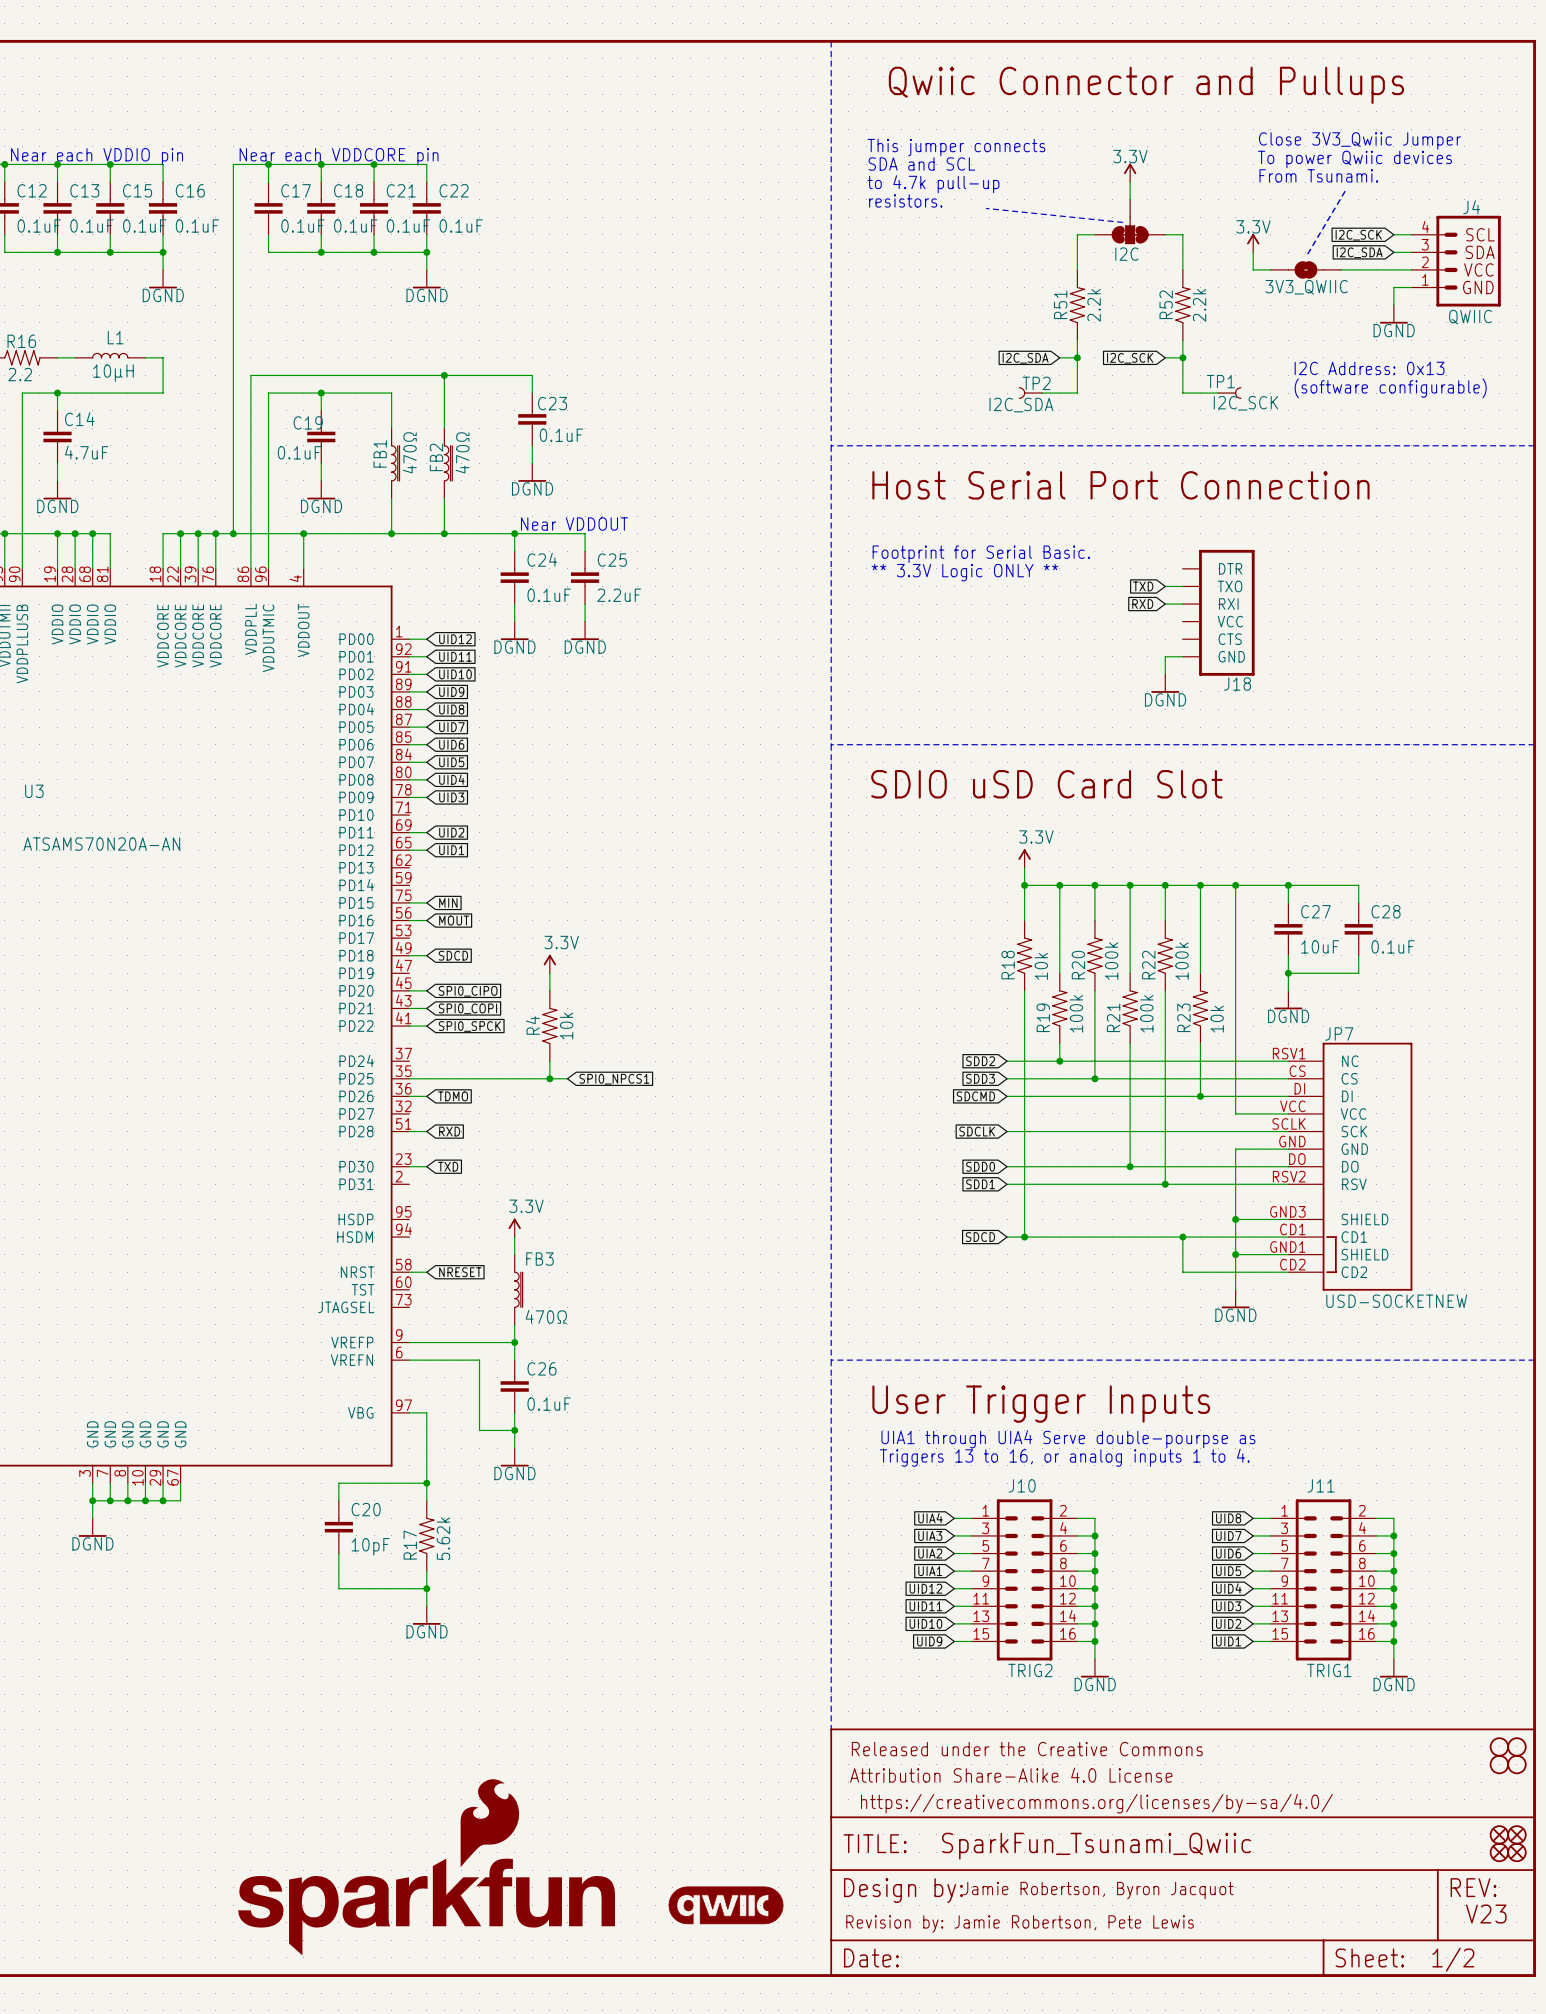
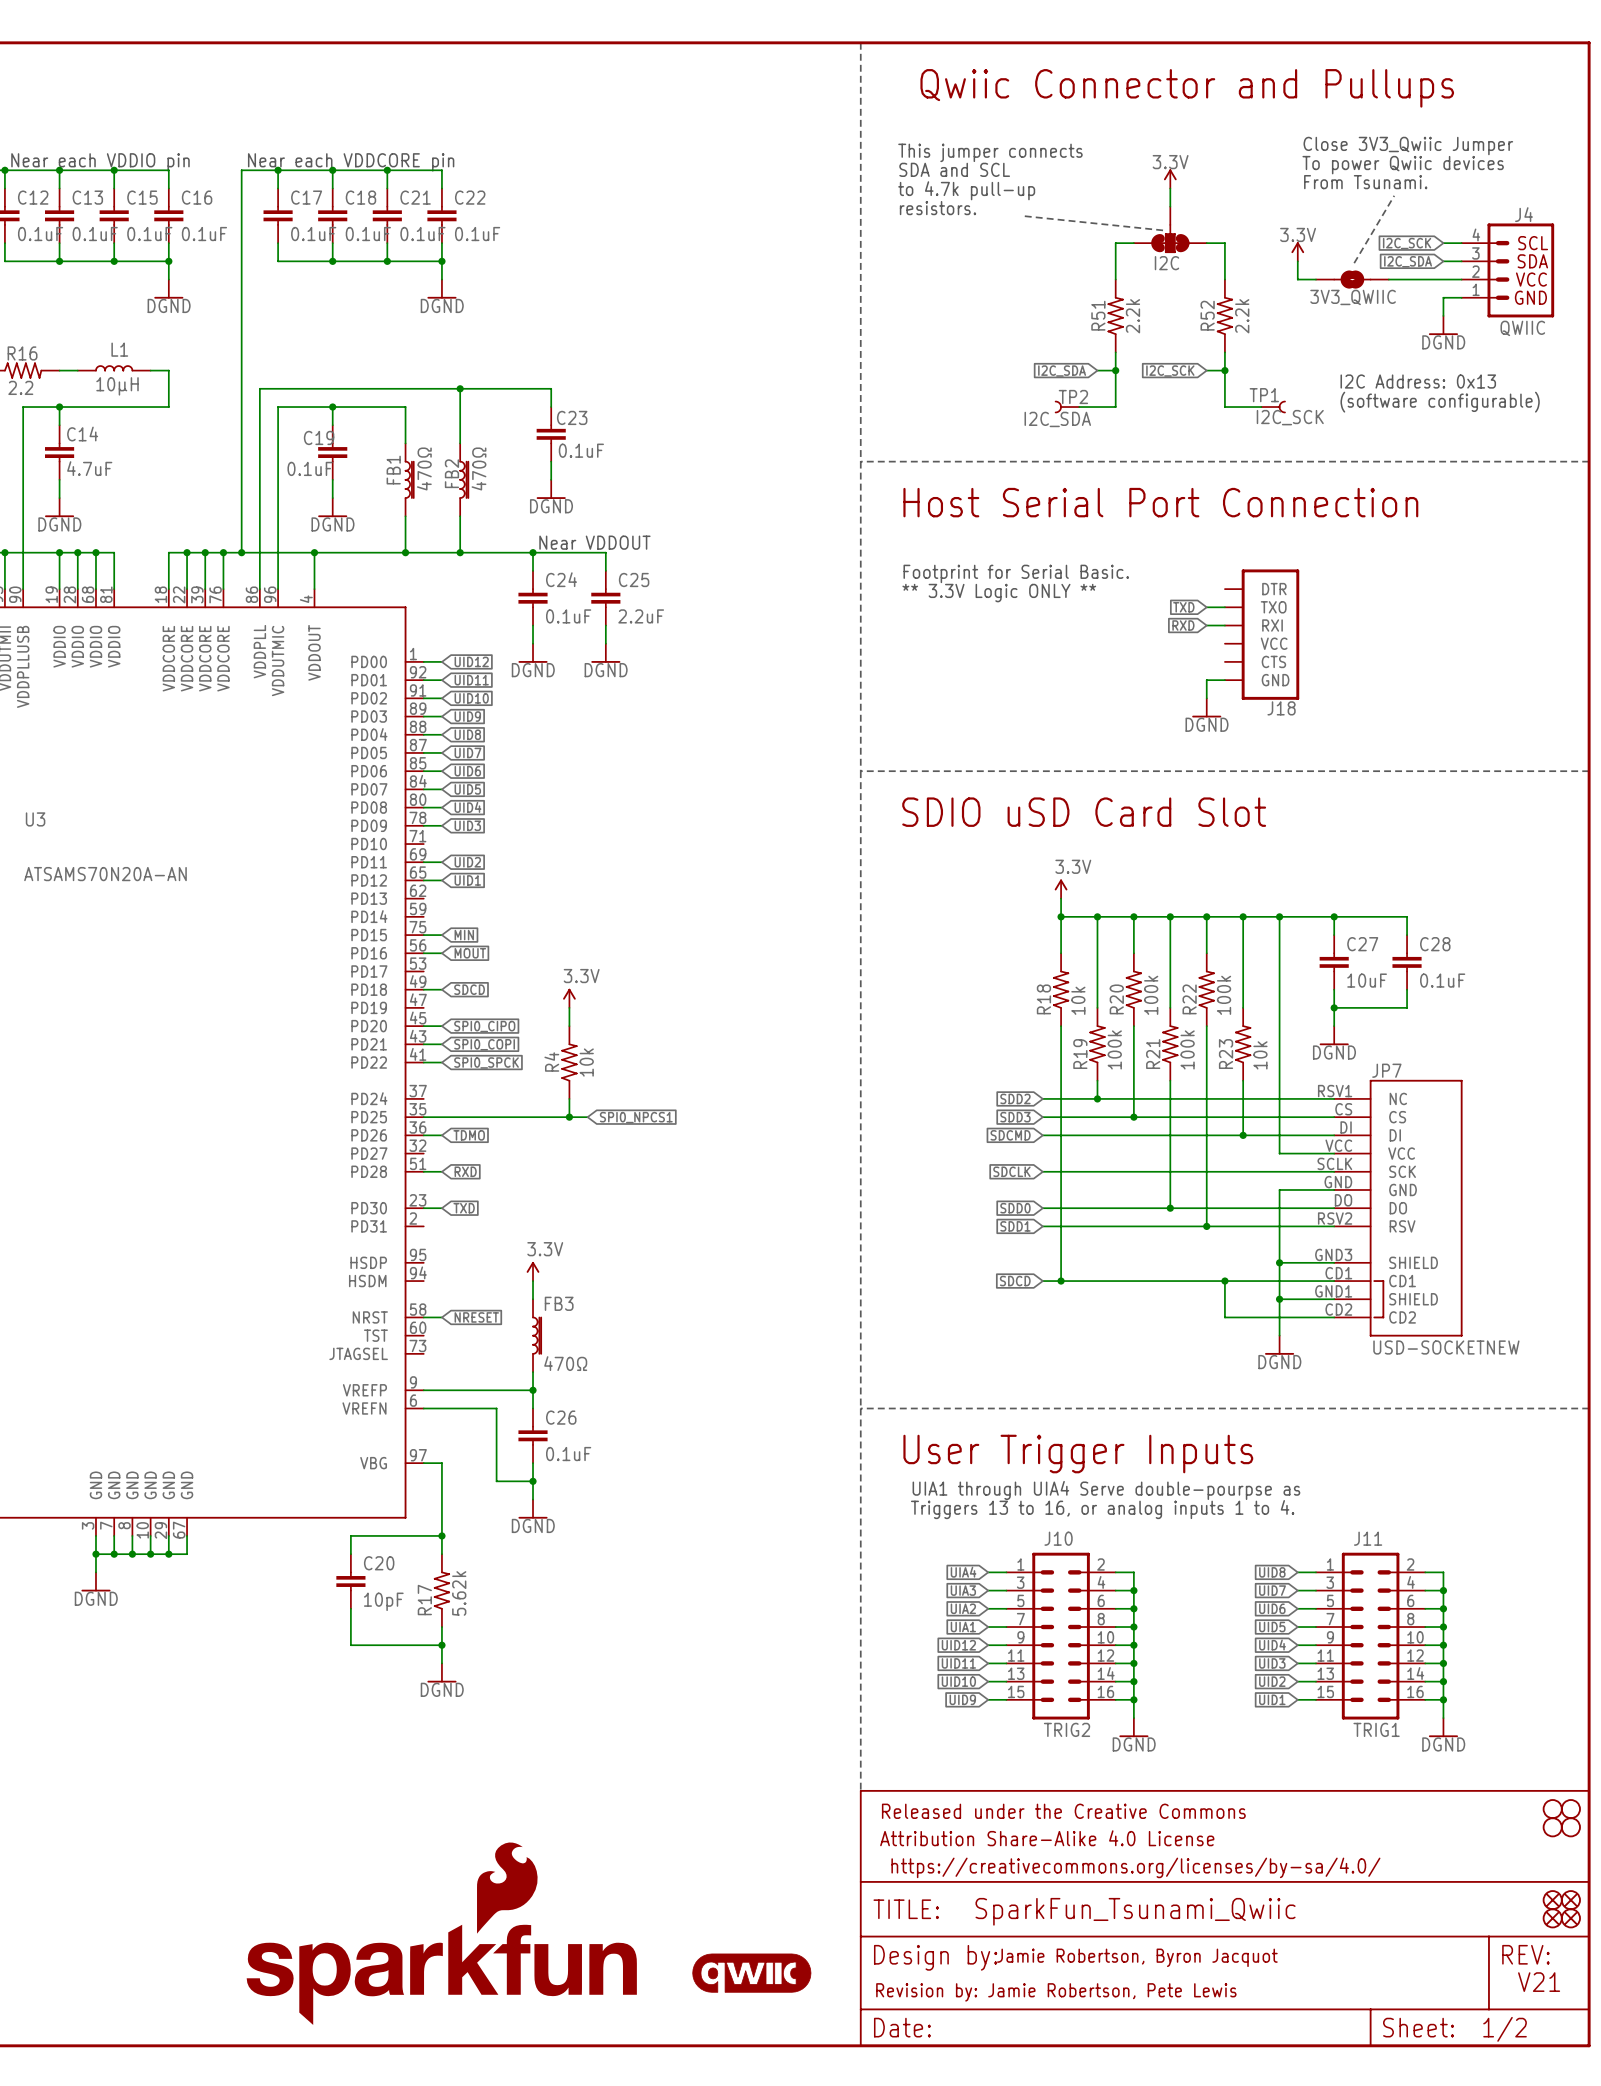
text: V23 (1486, 1914) -> V21 (1539, 1982)

